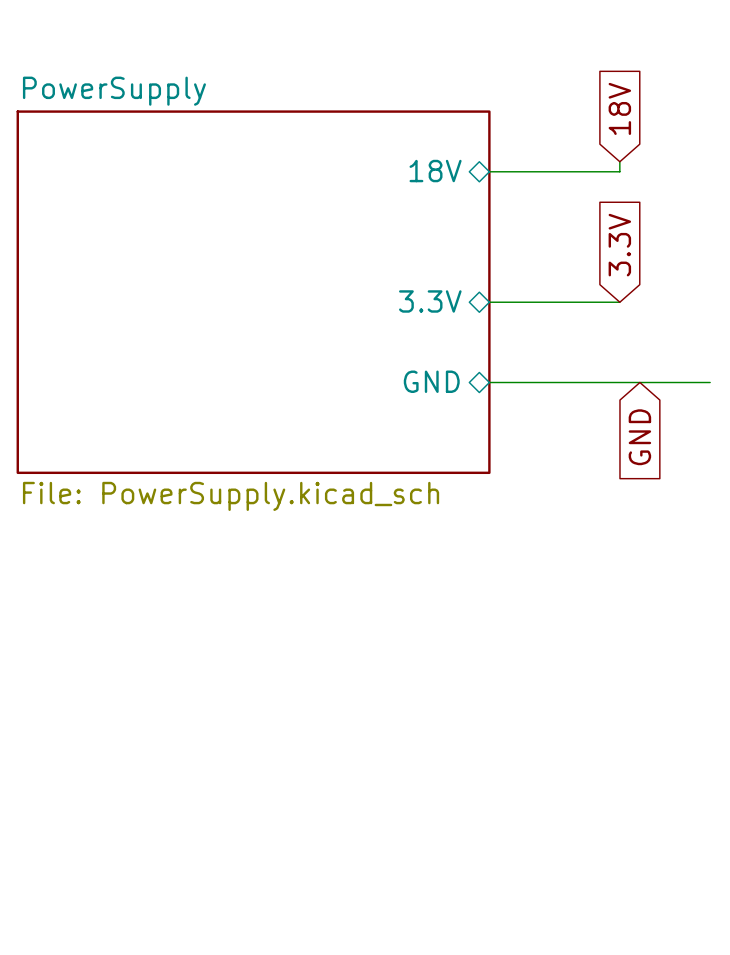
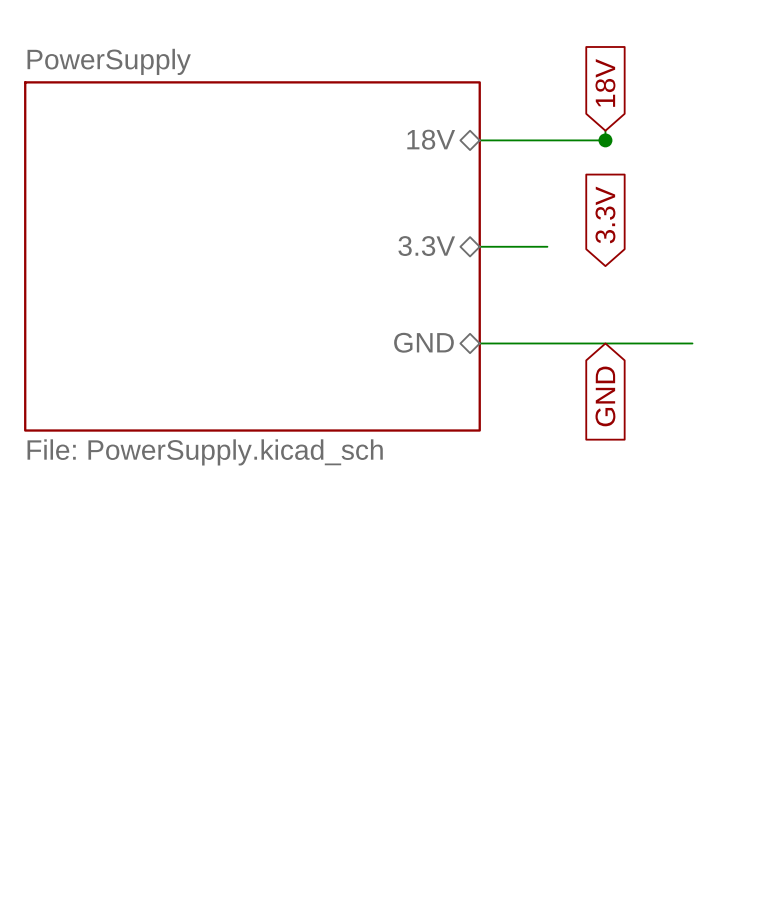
junction: none -> (605, 140)
wire: none -> (479, 246) (547, 246)
sheet pin position: 3.3V (430, 301) -> 3.3V (426, 246)
wire: (489, 302) (619, 302) -> none
global label position: GND (639, 437) -> GND (605, 396)

